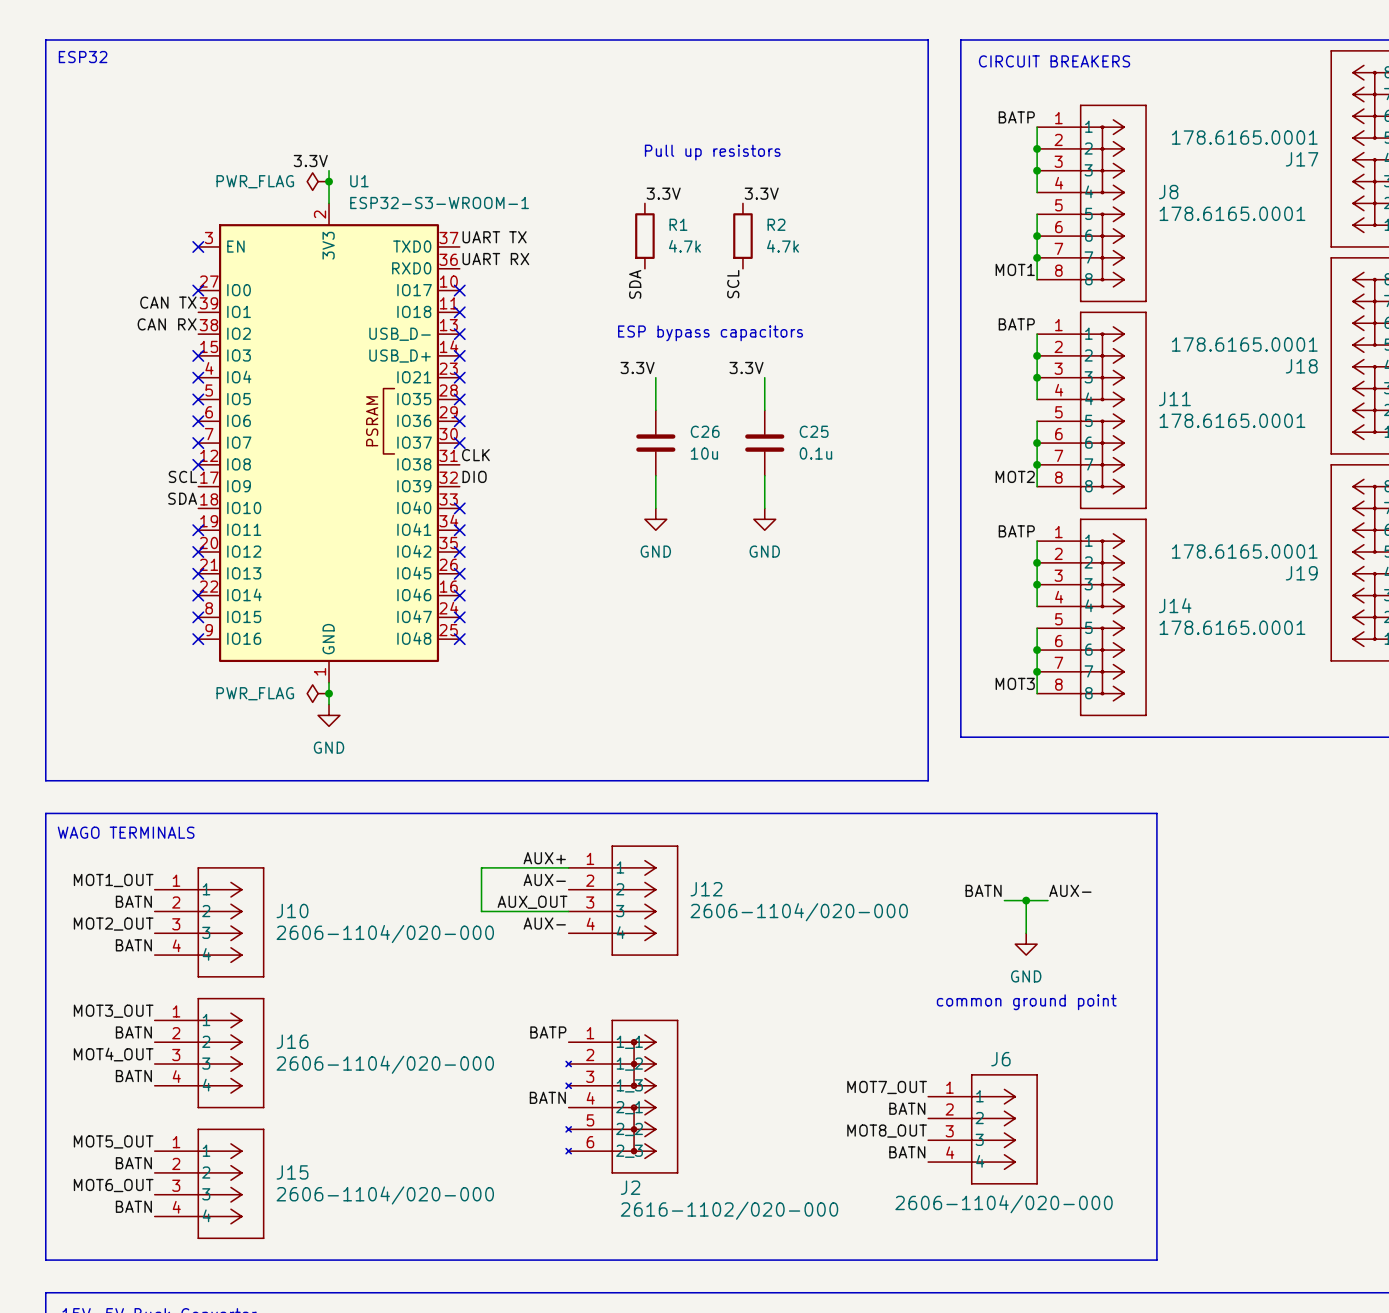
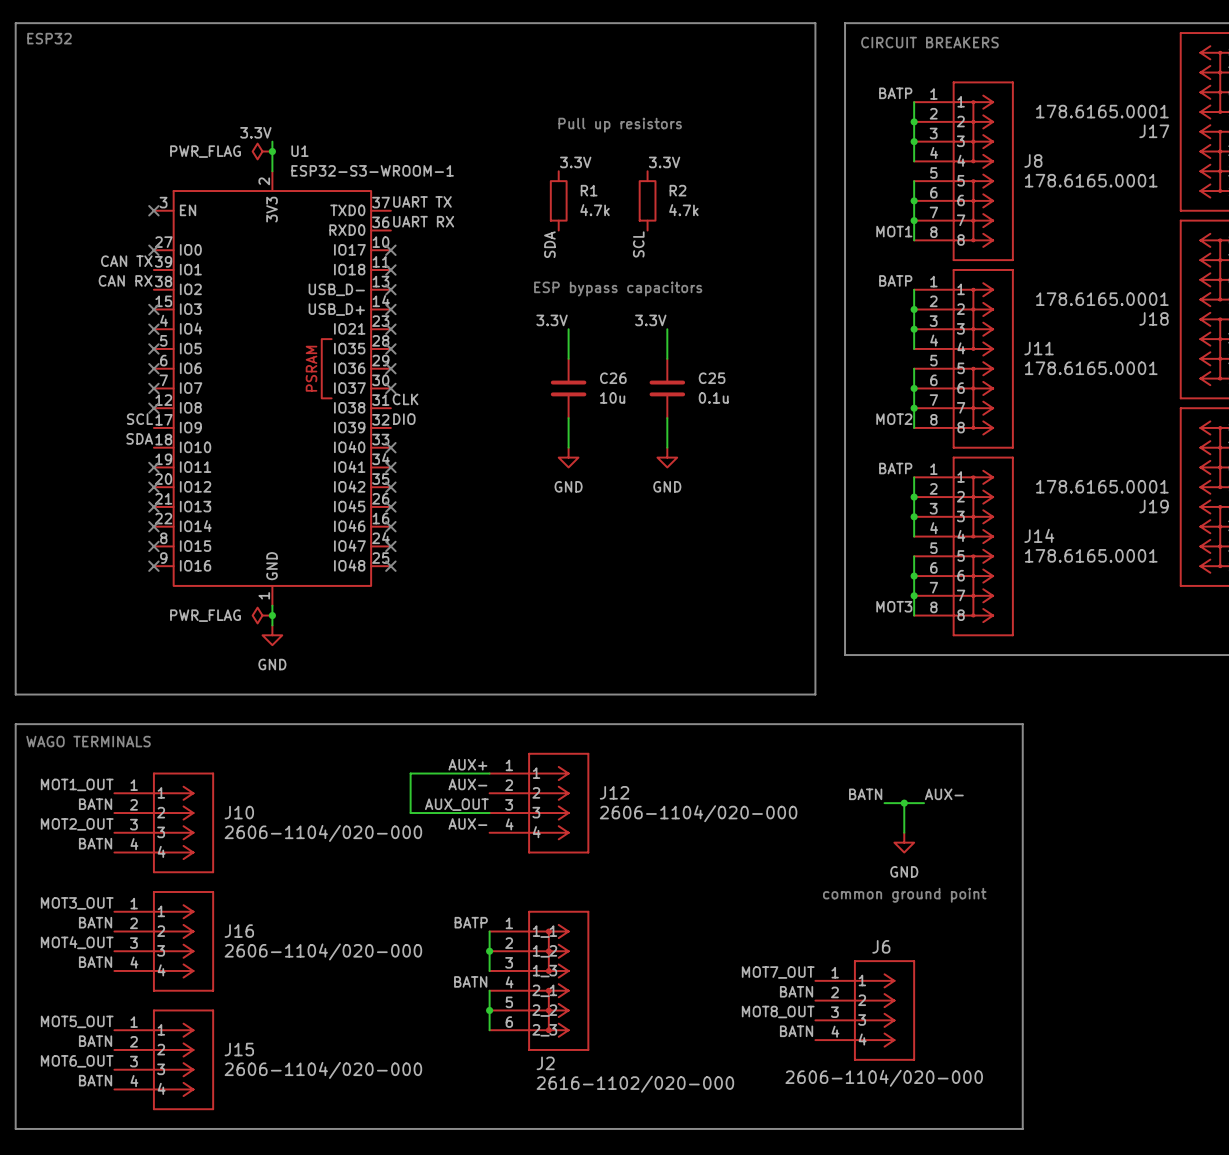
J2 symbol: [566, 1019, 679, 1174] -> [489, 911, 589, 1051]
wire: none -> (489, 931) (489, 970)
junction: none -> (489, 951)
wire: none -> (489, 990) (489, 1030)
junction: none -> (489, 1010)

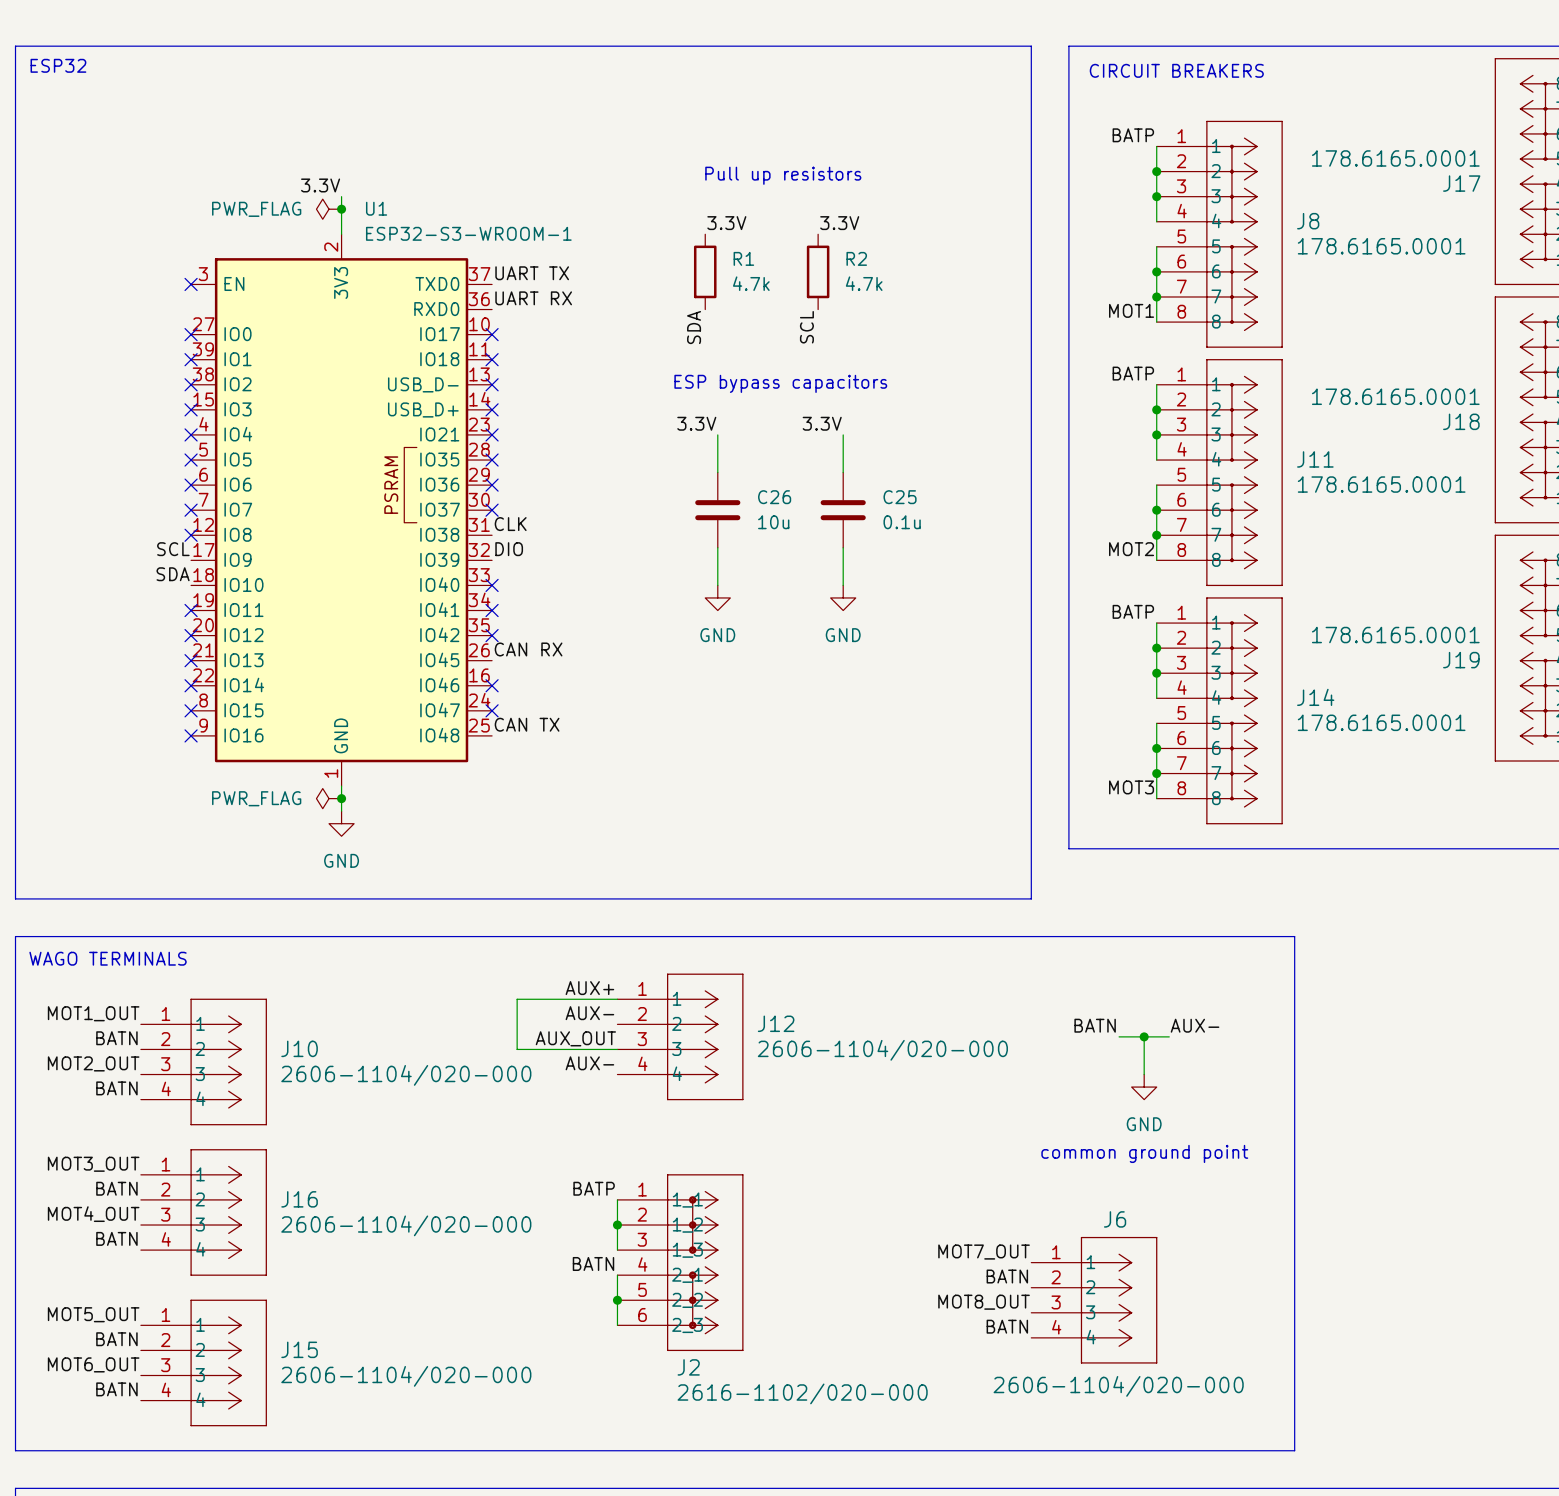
label: CAN TX (126, 261) -> none
no-connect mark: none -> (191, 359)
label: CAN RX (125, 280) -> none
no-connect mark: none -> (191, 384)
label: none -> CAN RX (528, 649)
no-connect mark: (390, 506) -> none
label: none -> CAN TX (527, 724)
no-connect mark: (390, 566) -> none

